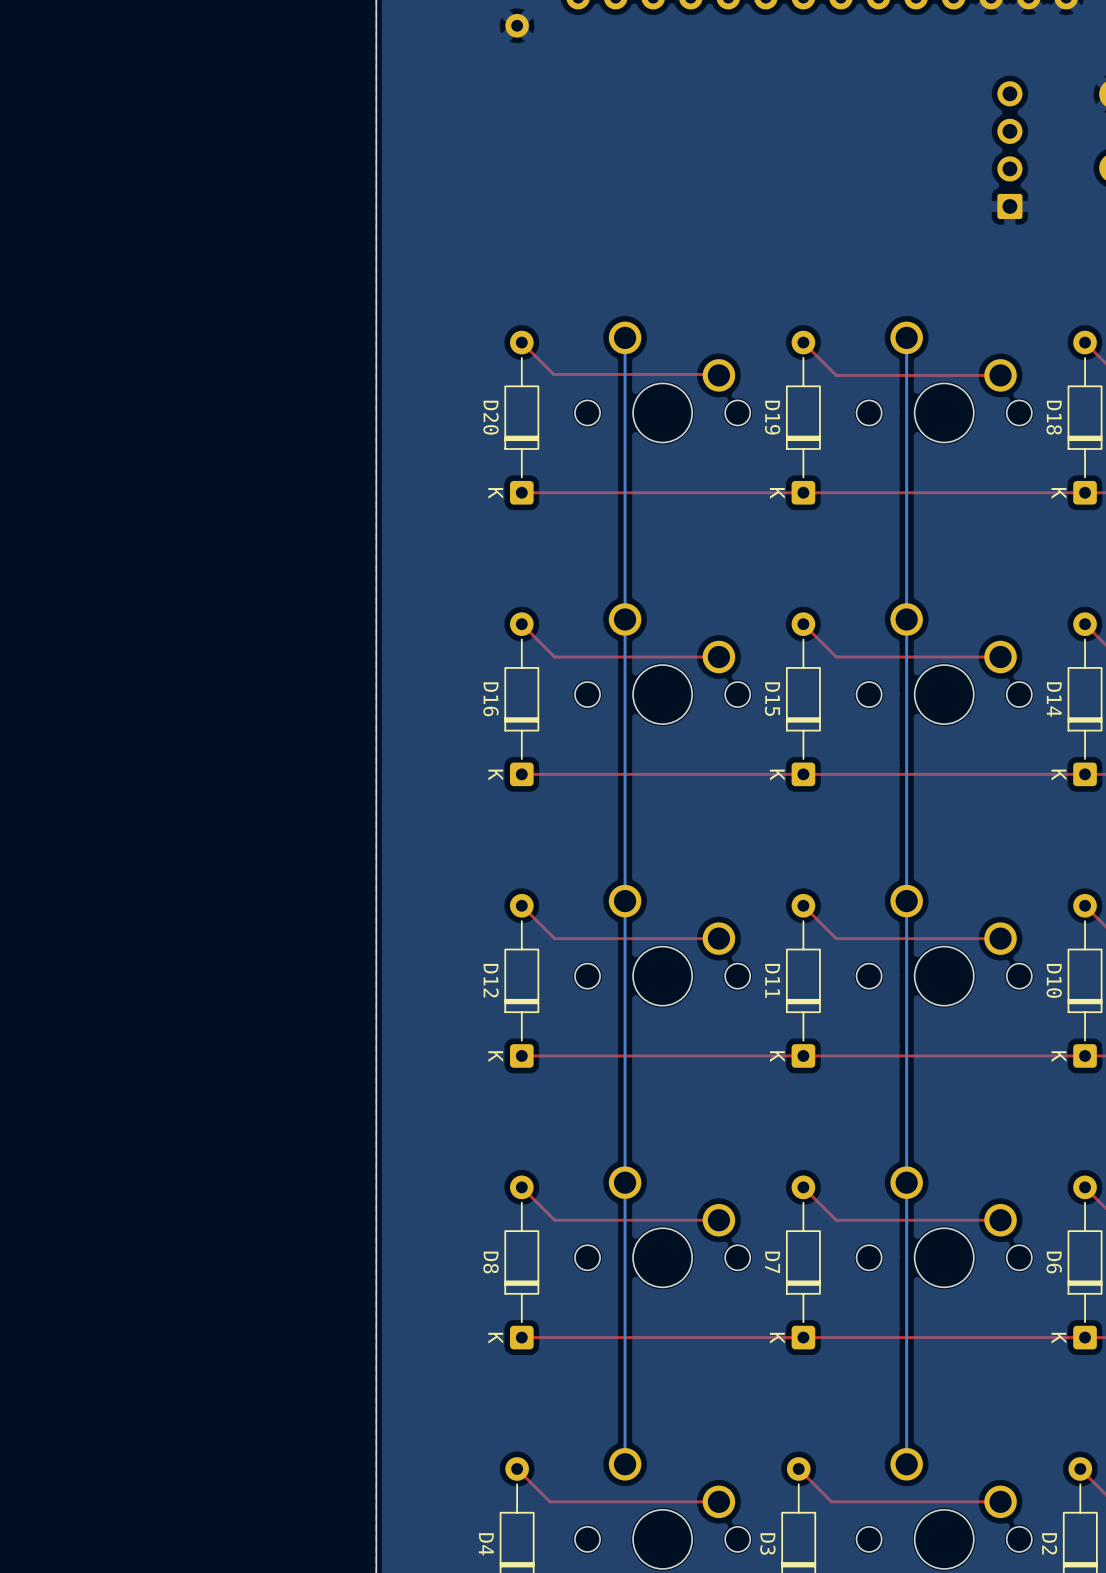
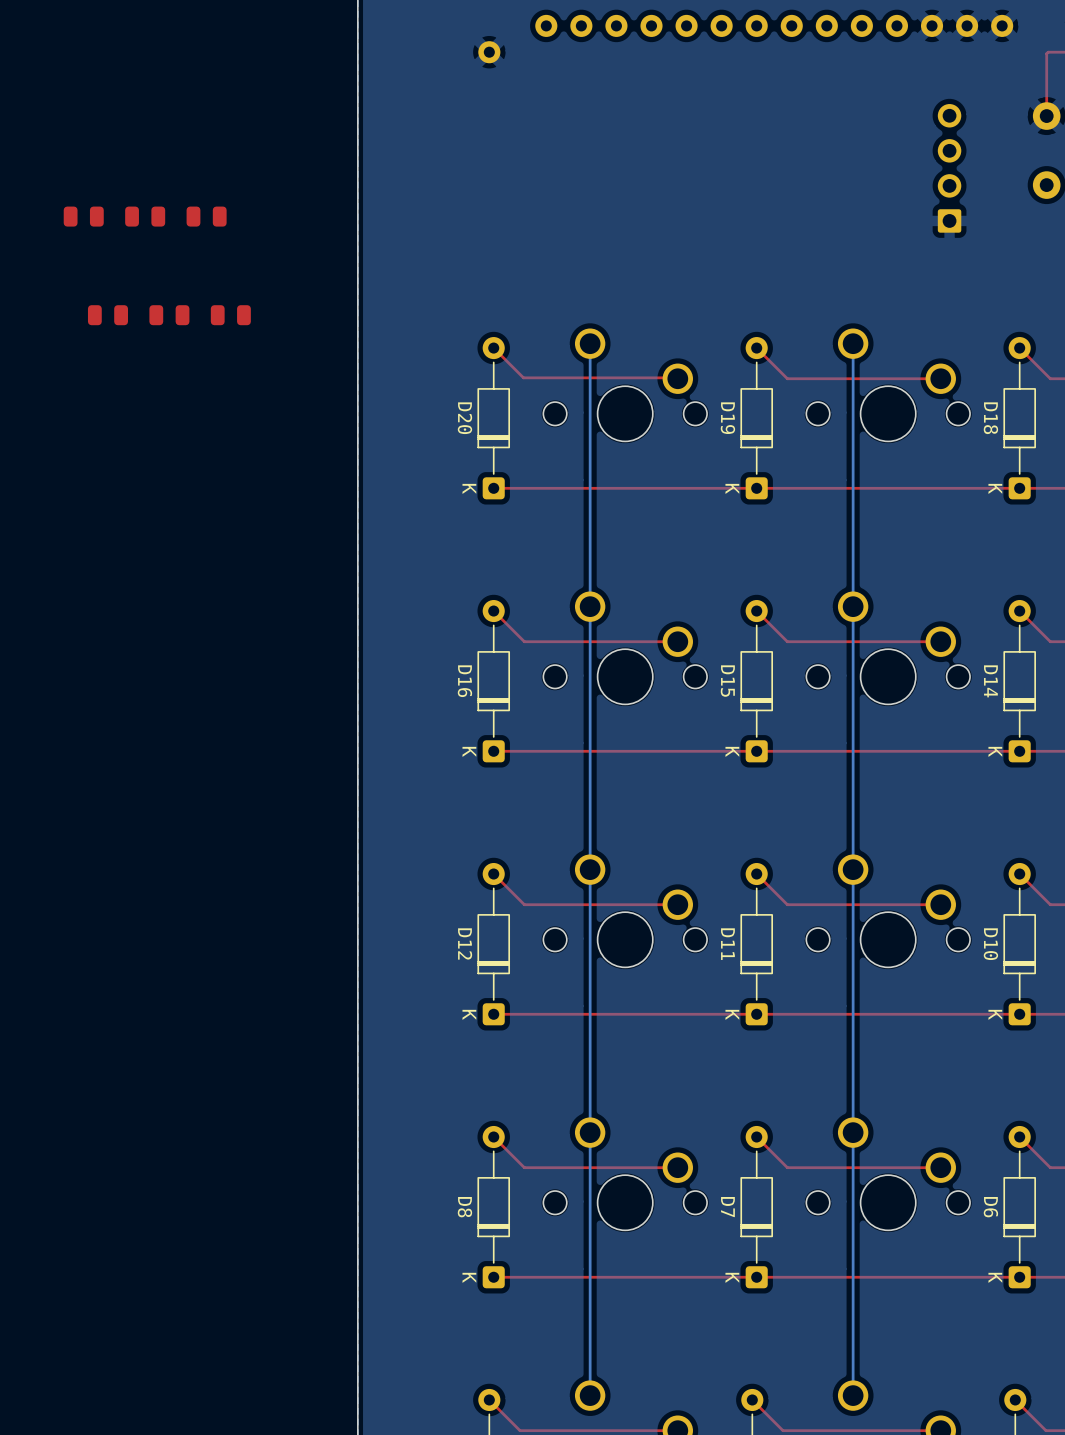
part: none -> (83, 216)
part: none -> (145, 216)
part: none -> (206, 216)
part: none -> (107, 315)
part: none -> (169, 315)
part: none -> (230, 315)

